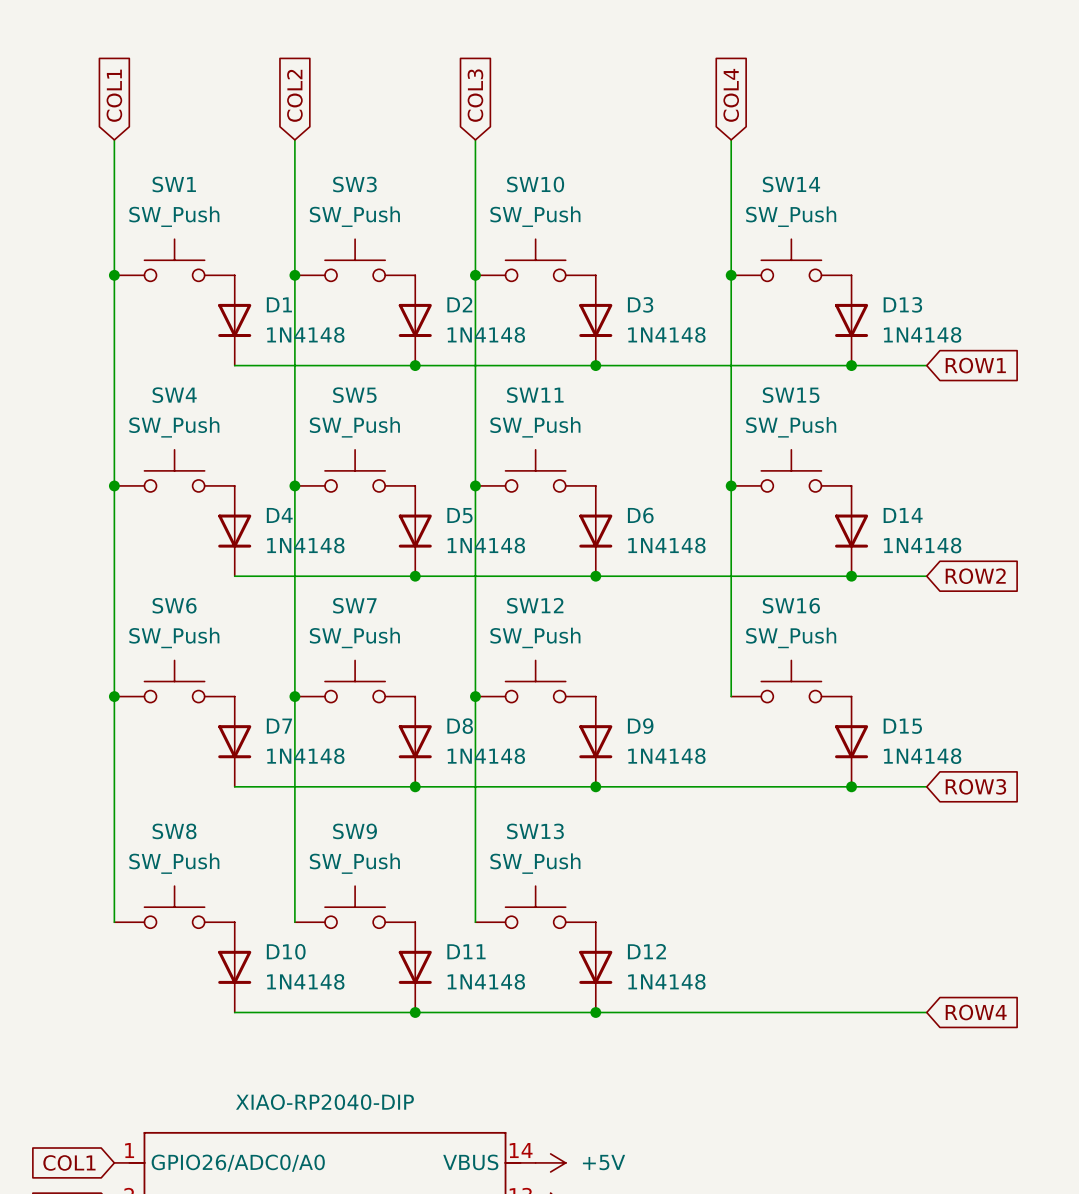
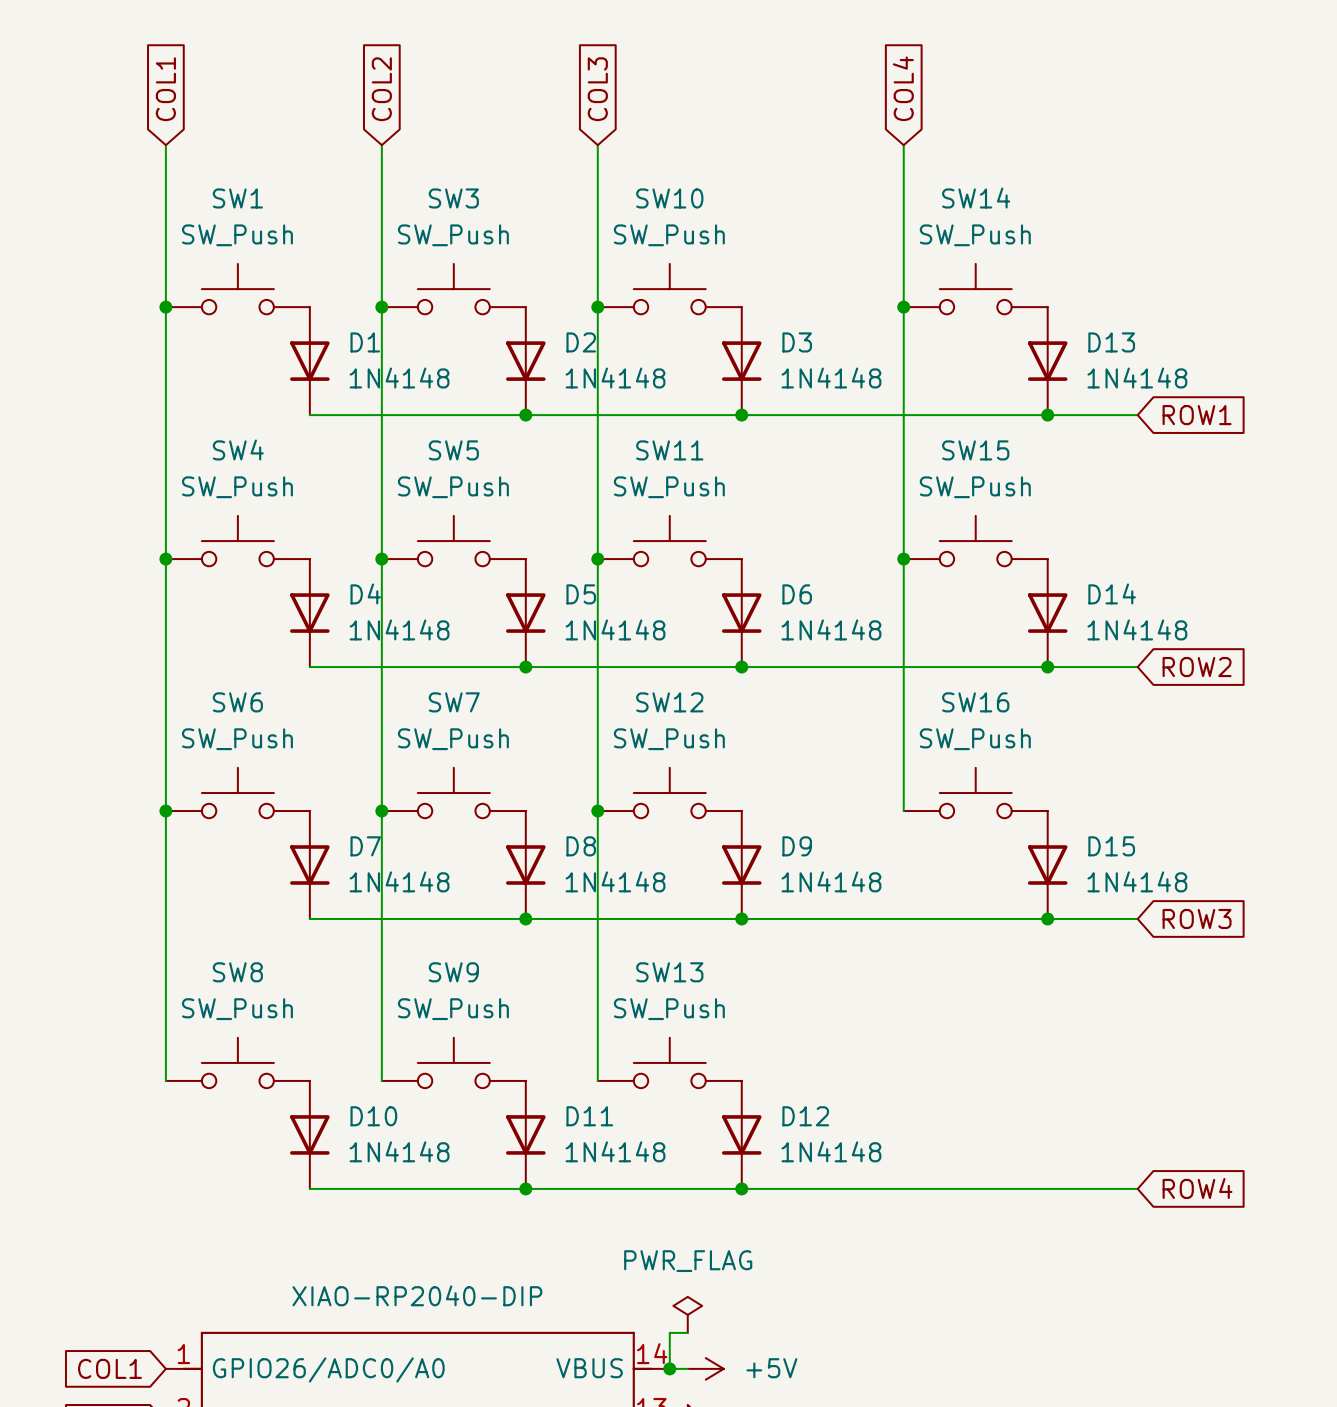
power symbol: none -> PWR_FLAG (687, 1314)
wire: none -> (687, 1332) (669, 1332) (669, 1368) (687, 1368)
junction: none -> (669, 1368)
power symbol position: +5V (550, 1162) -> +5V (705, 1368)

